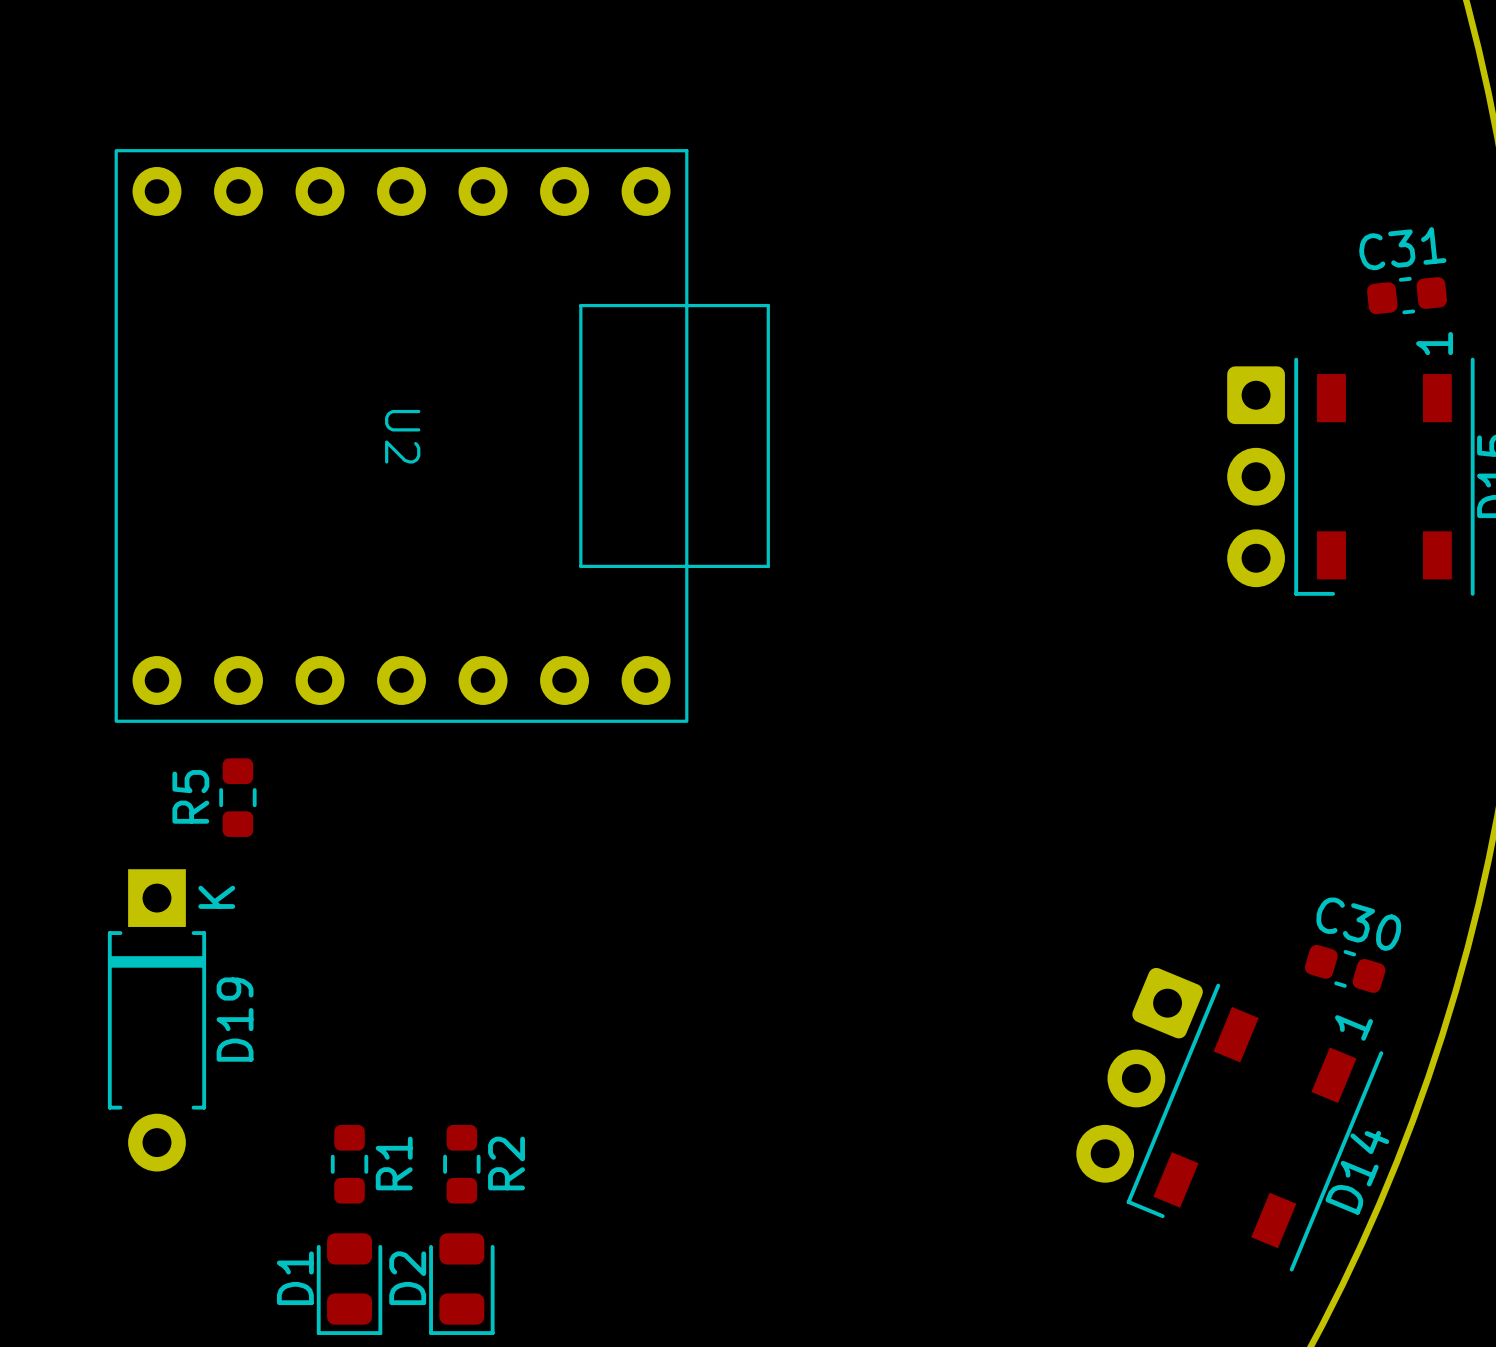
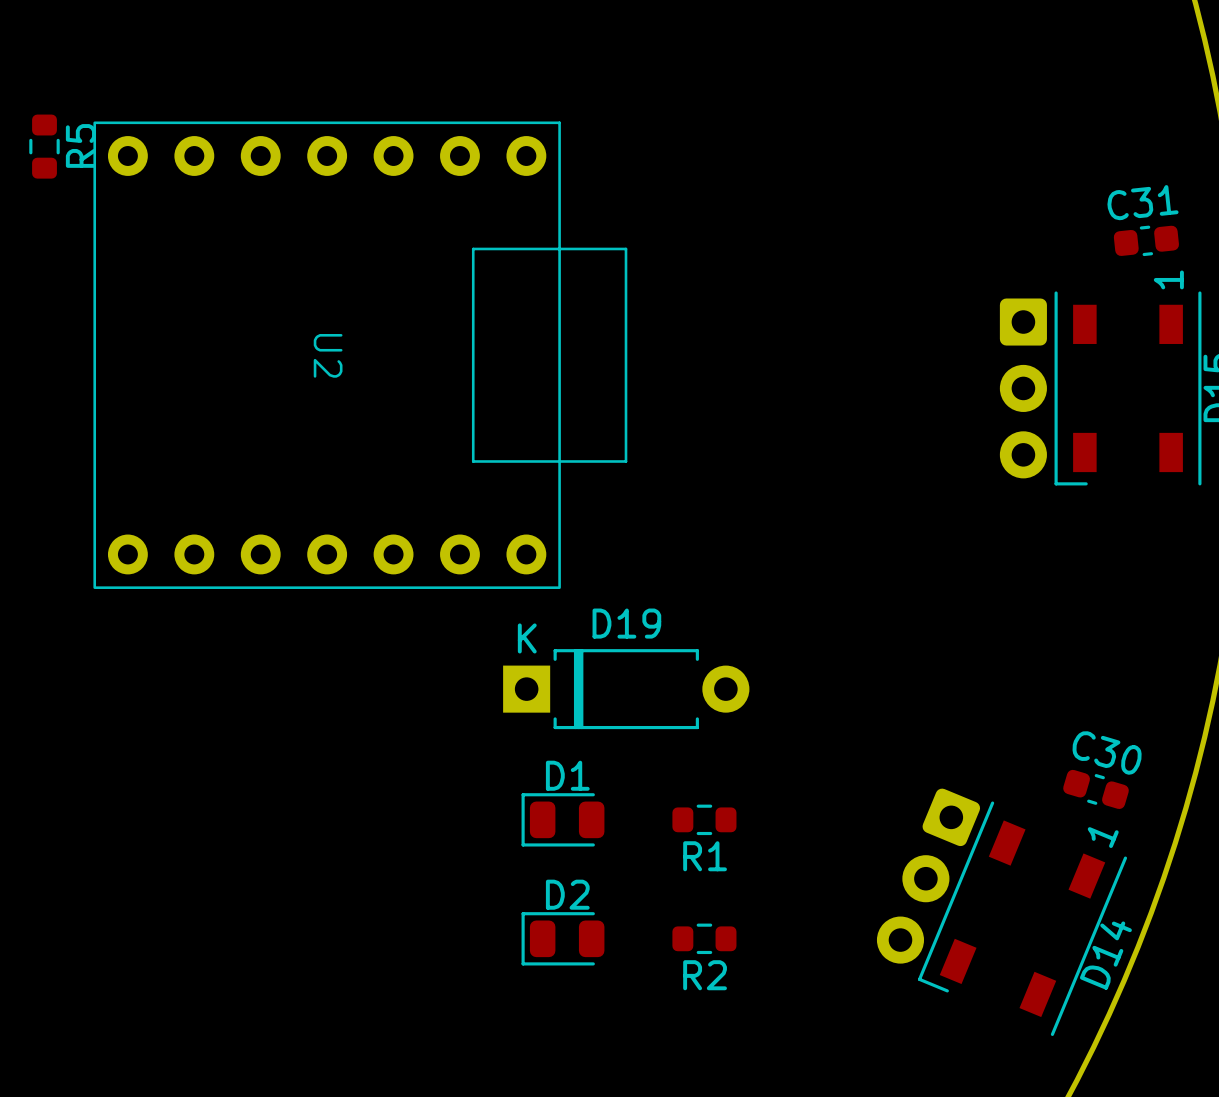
R5 name position: R5 (190, 796) -> R5 (80, 145)
R5 position: (237, 797) -> (44, 146)
D19 rotation: 0° (156, 1020) -> 90° counterclockwise (626, 689)
D19 position: (156, 1020) -> (626, 689)
R1 rotation: 0° (349, 1164) -> 90° clockwise (704, 819)
R1 position: (349, 1164) -> (704, 819)
R2 rotation: 0° (461, 1164) -> 90° clockwise (704, 938)
R2 position: (461, 1164) -> (704, 938)
D1 rotation: 0° (349, 1284) -> 90° clockwise (562, 819)
D1 position: (349, 1284) -> (562, 819)
D2 rotation: 0° (461, 1284) -> 90° clockwise (562, 938)
D2 position: (461, 1284) -> (562, 938)

